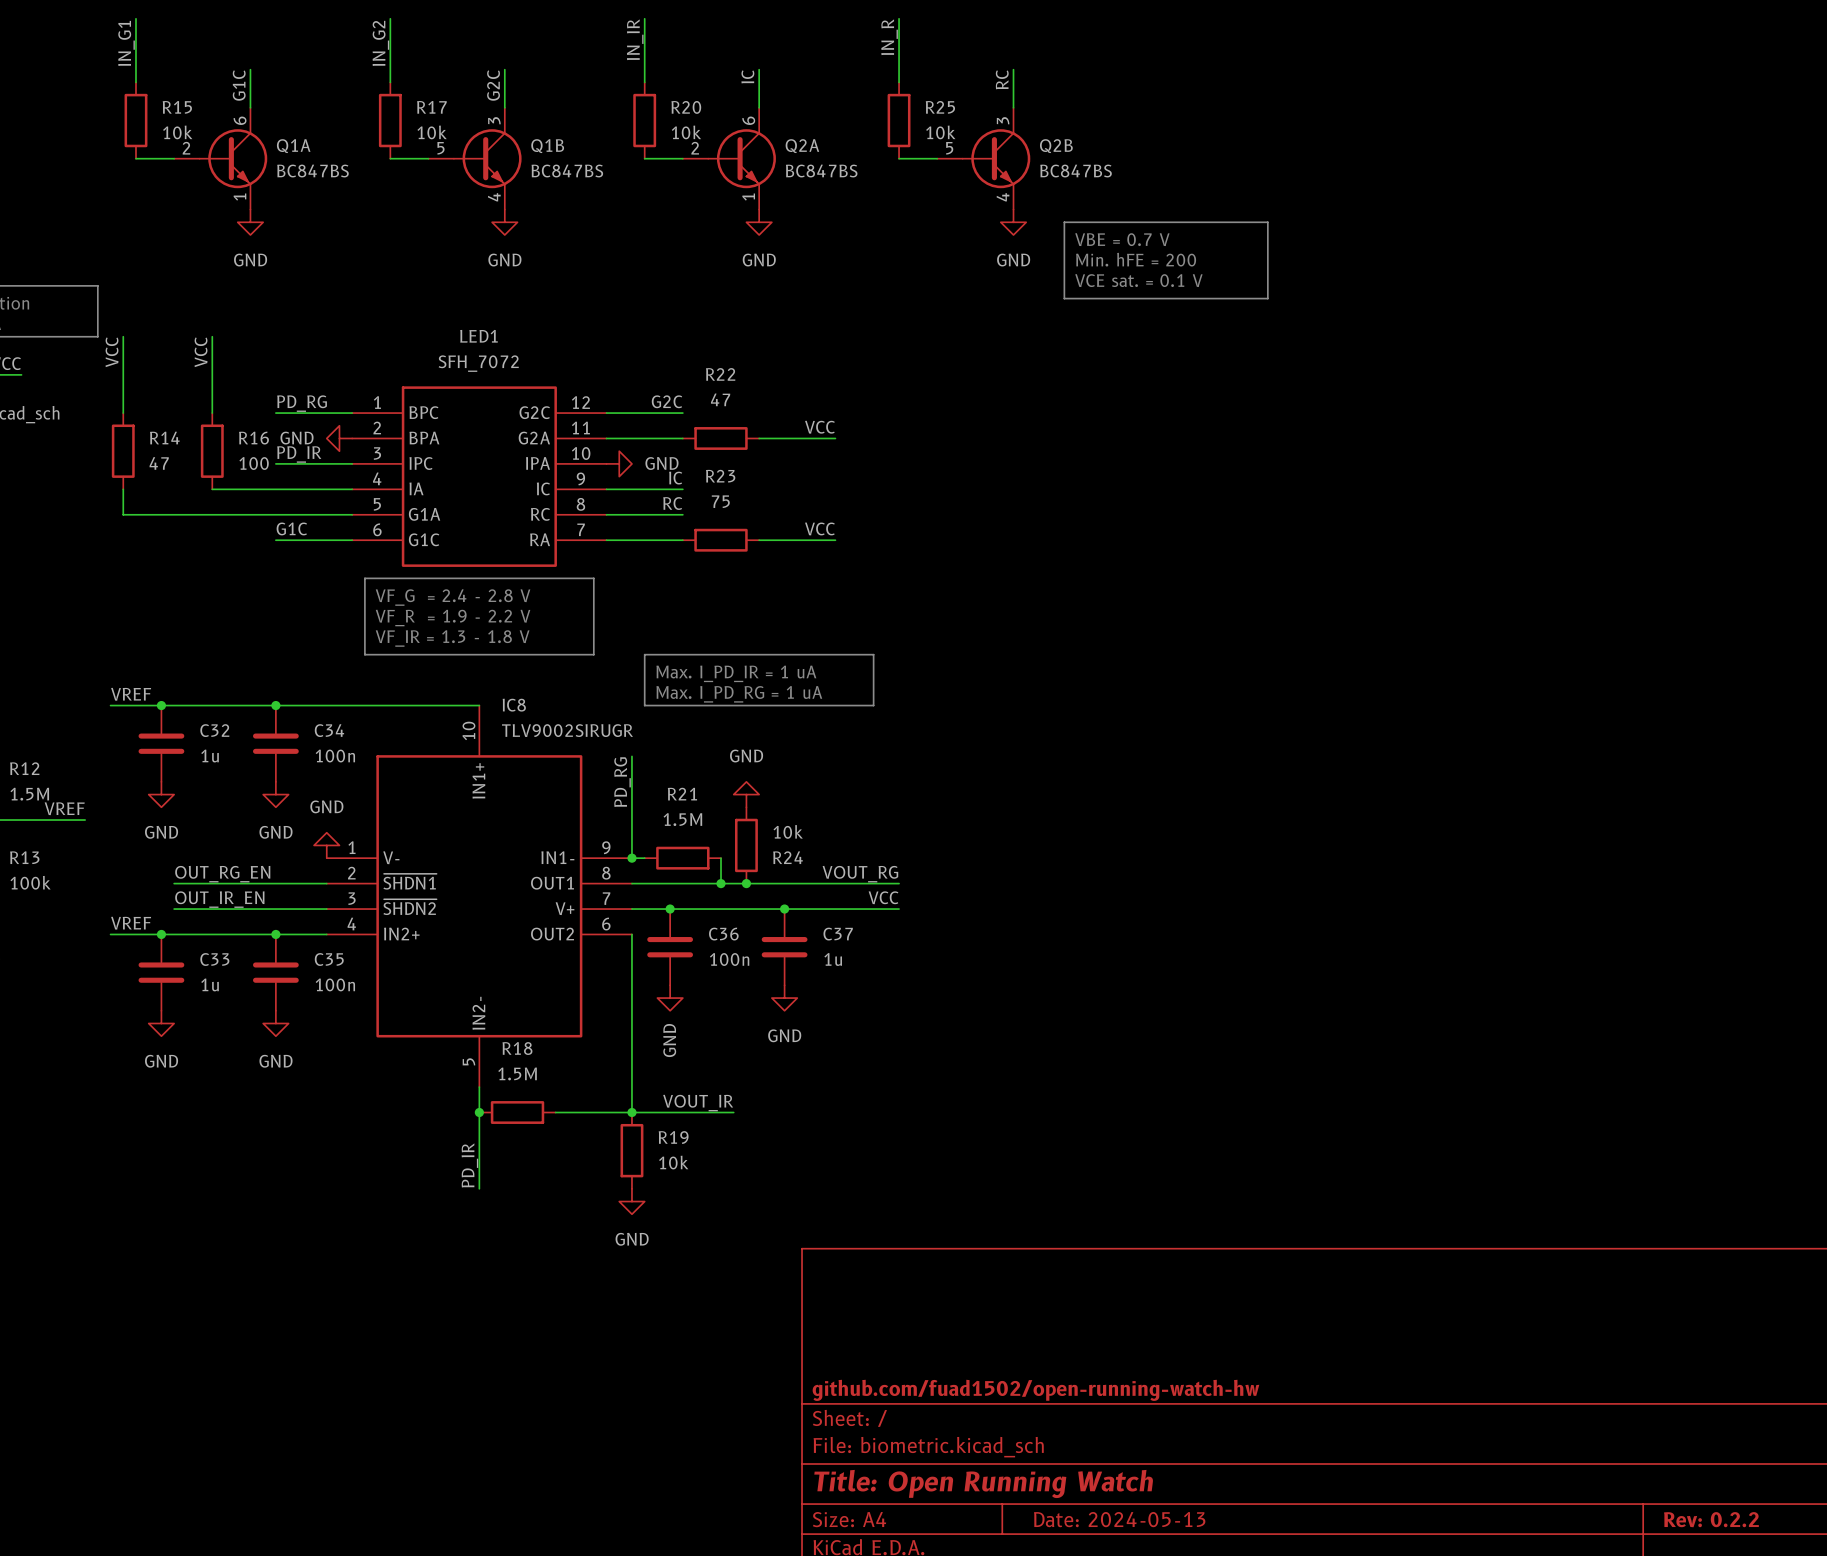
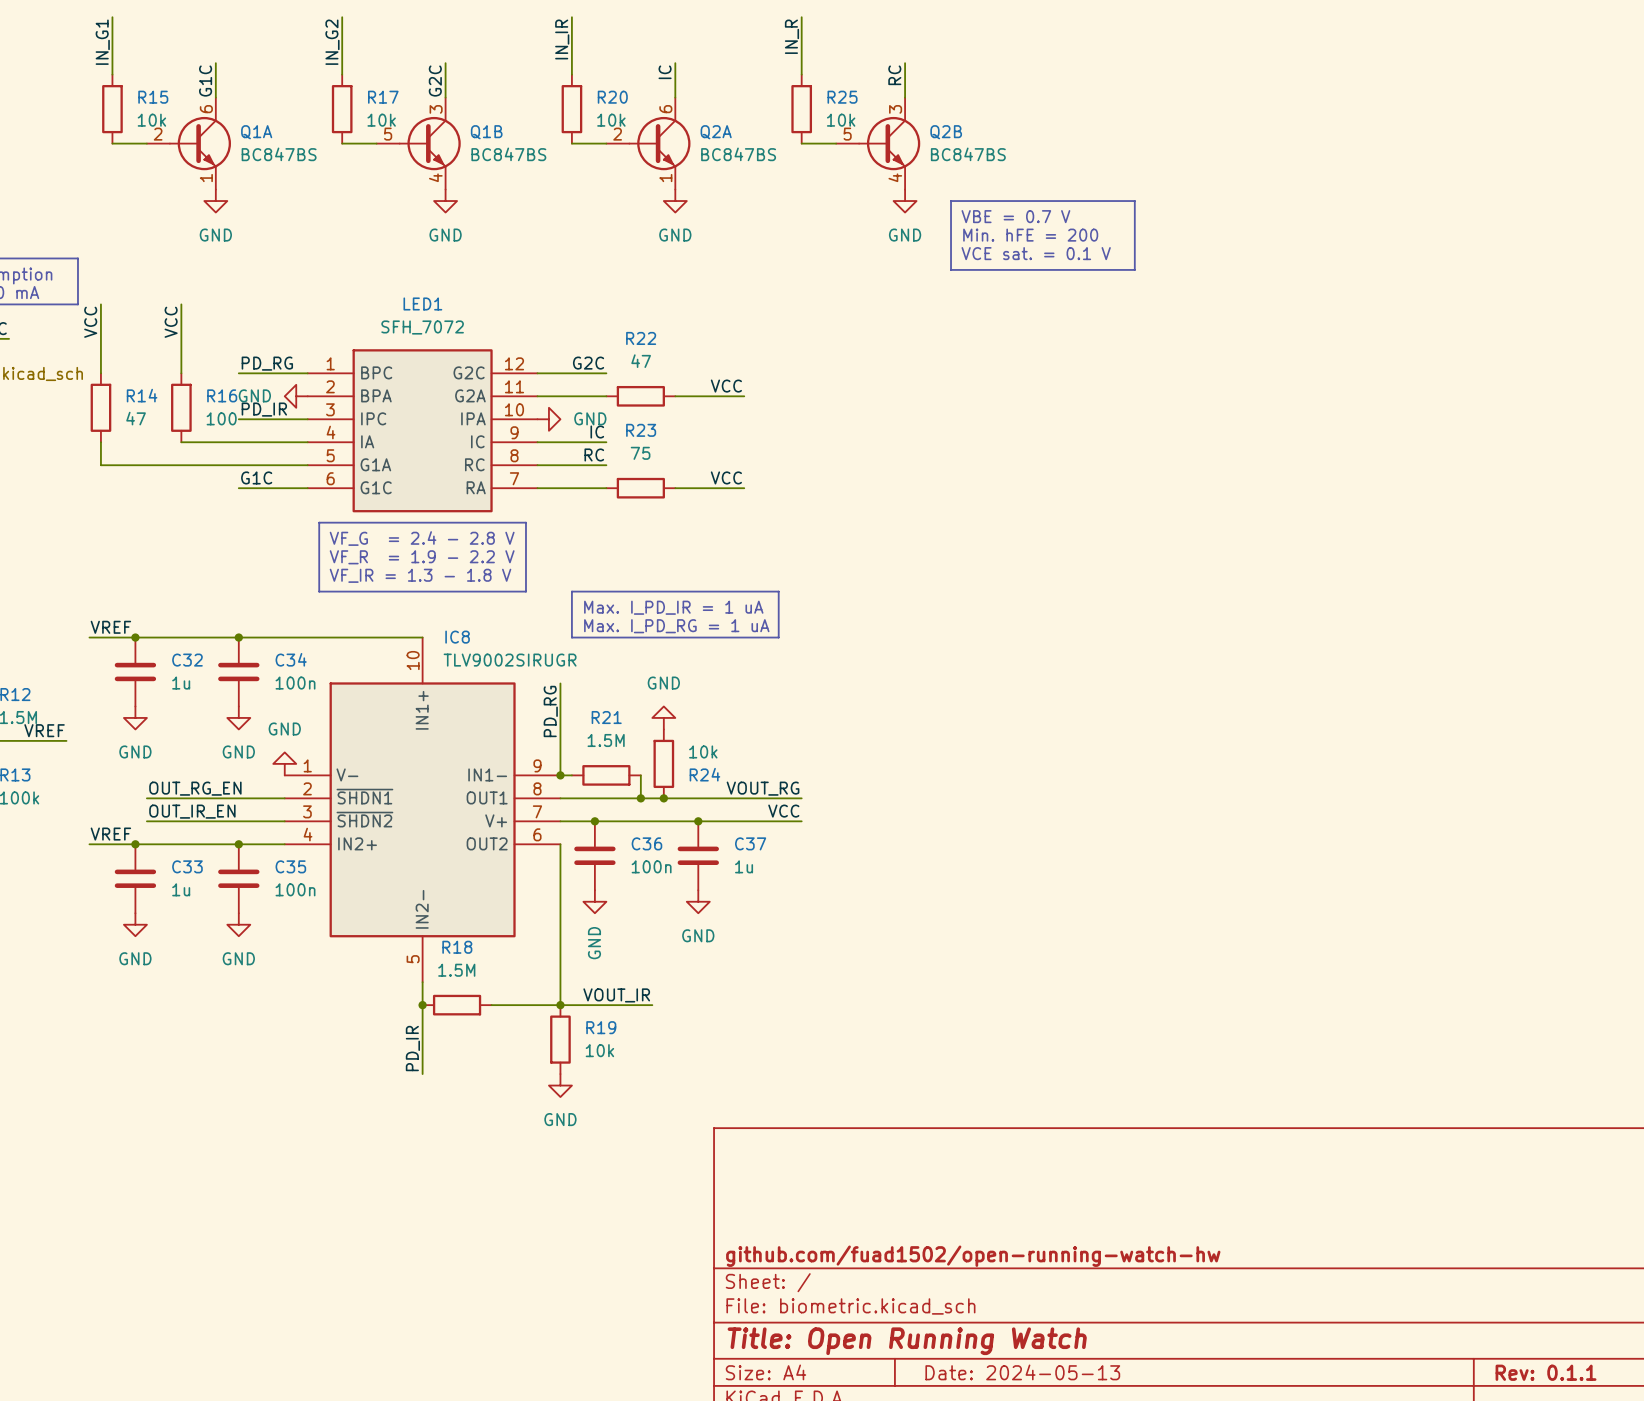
title block: Rev: 0.2.2 (1711, 1519) -> Rev: 0.1.1 (1546, 1372)

